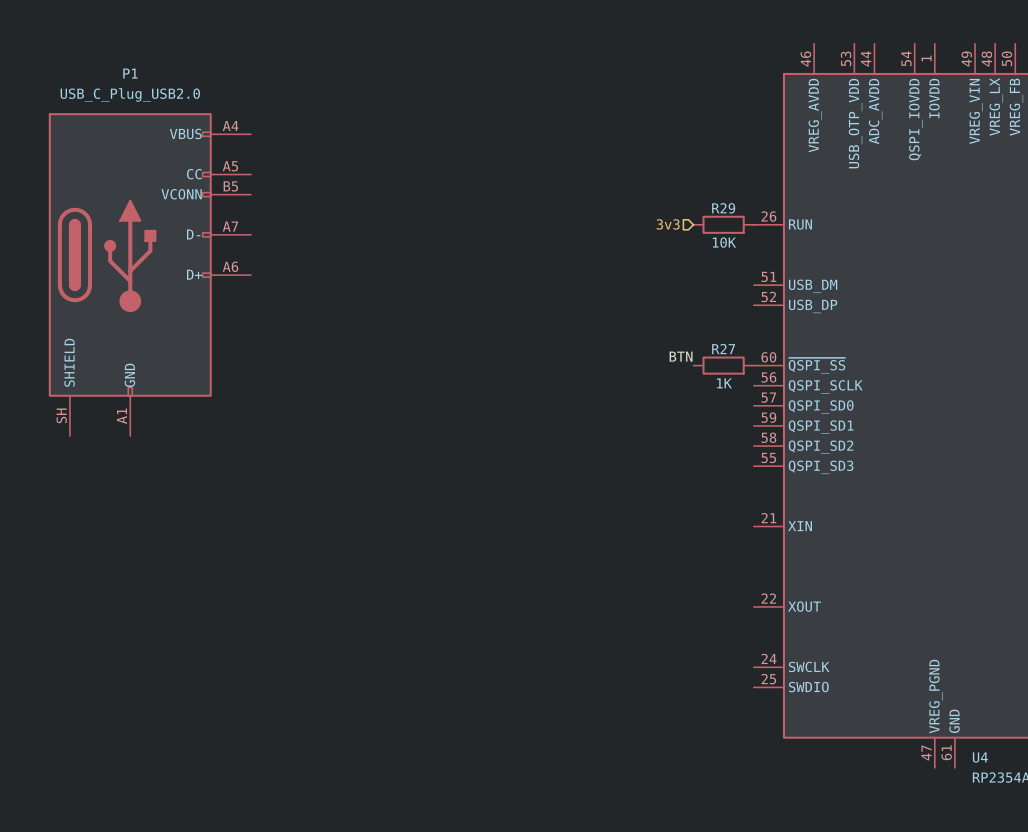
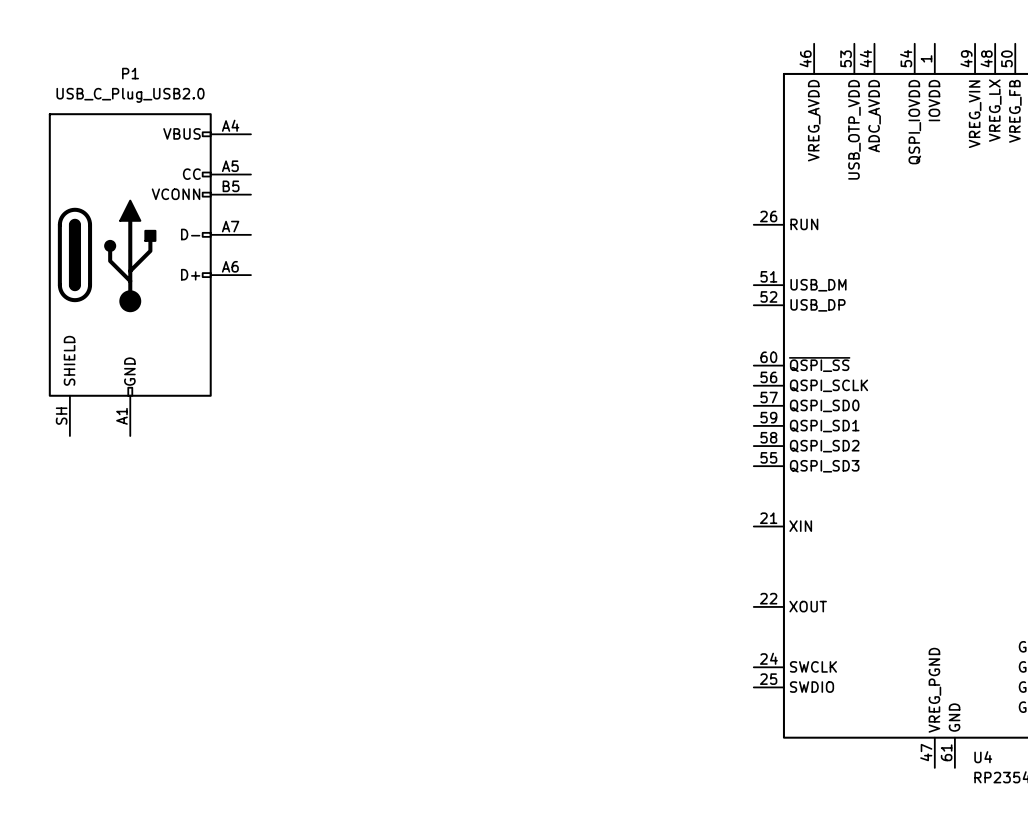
hierarchical label: 3v3 (668, 224) -> none
R29: 10K (723, 224) -> none
label: BTN (681, 356) -> none
R27: 1K (723, 365) -> none

